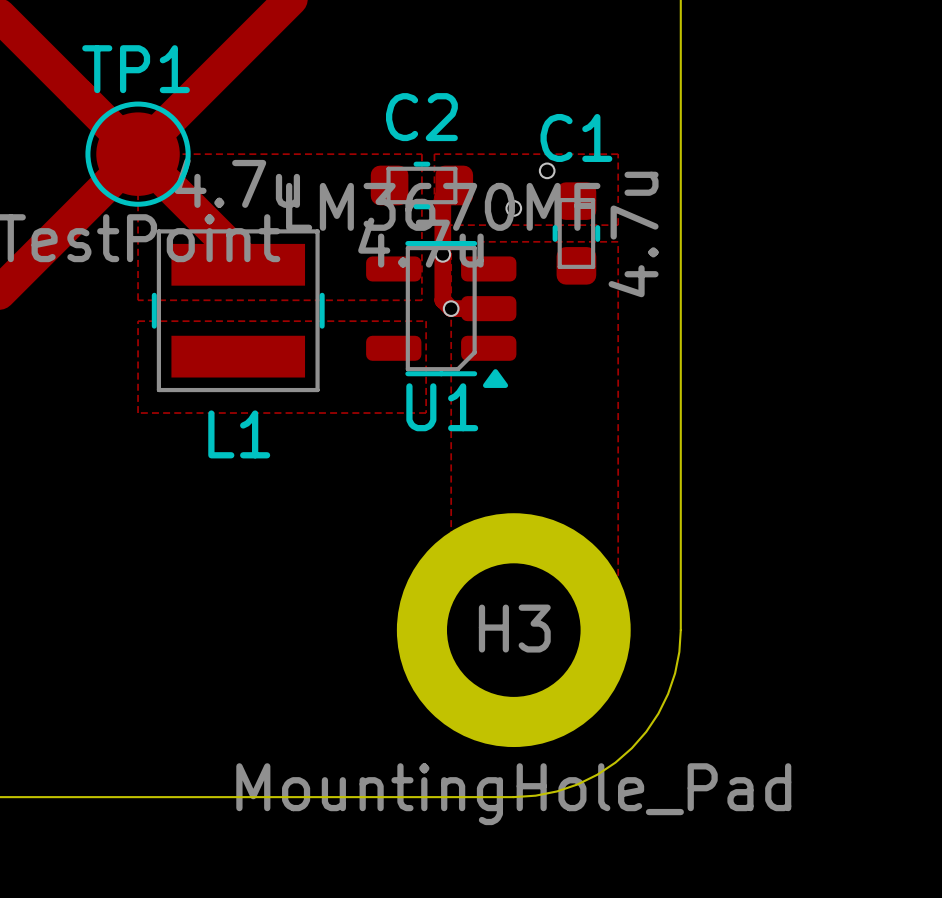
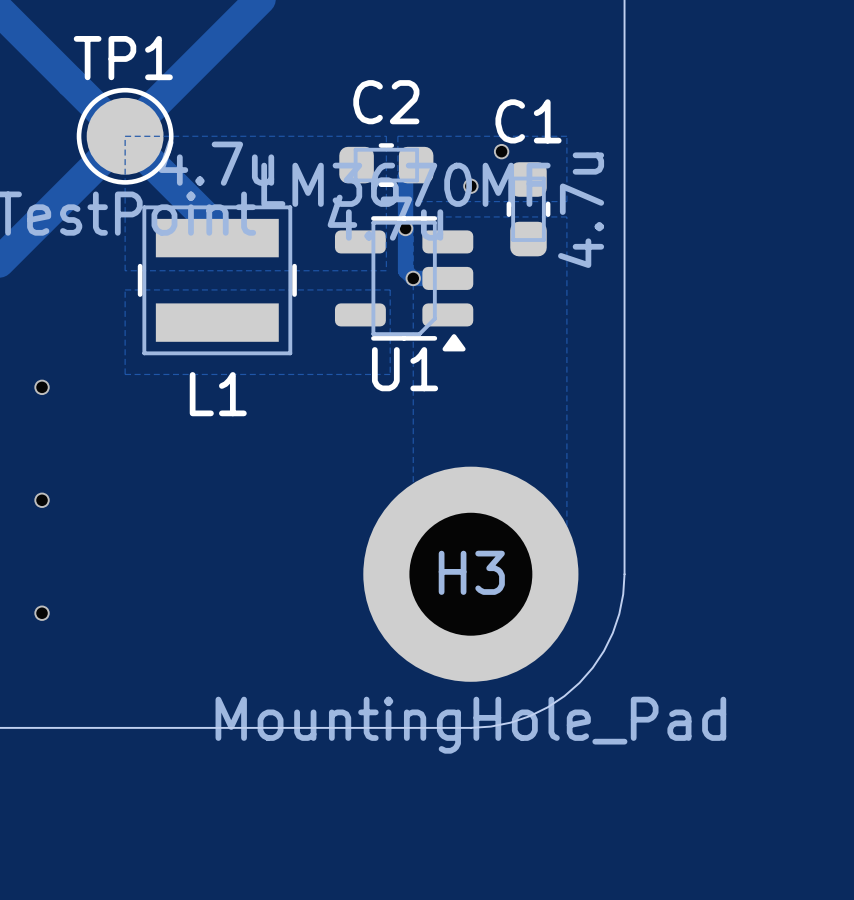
via: none -> (42, 387)
via: none -> (42, 500)
via: none -> (42, 613)

